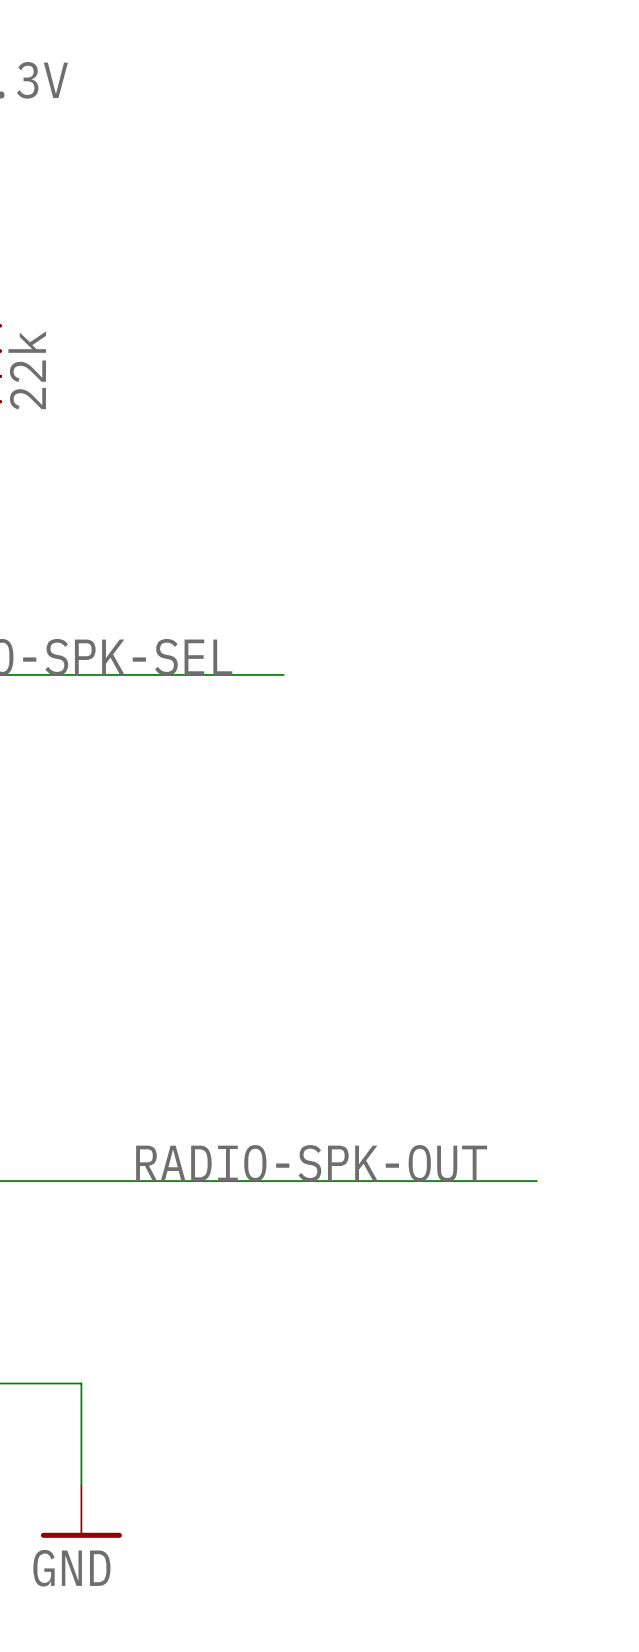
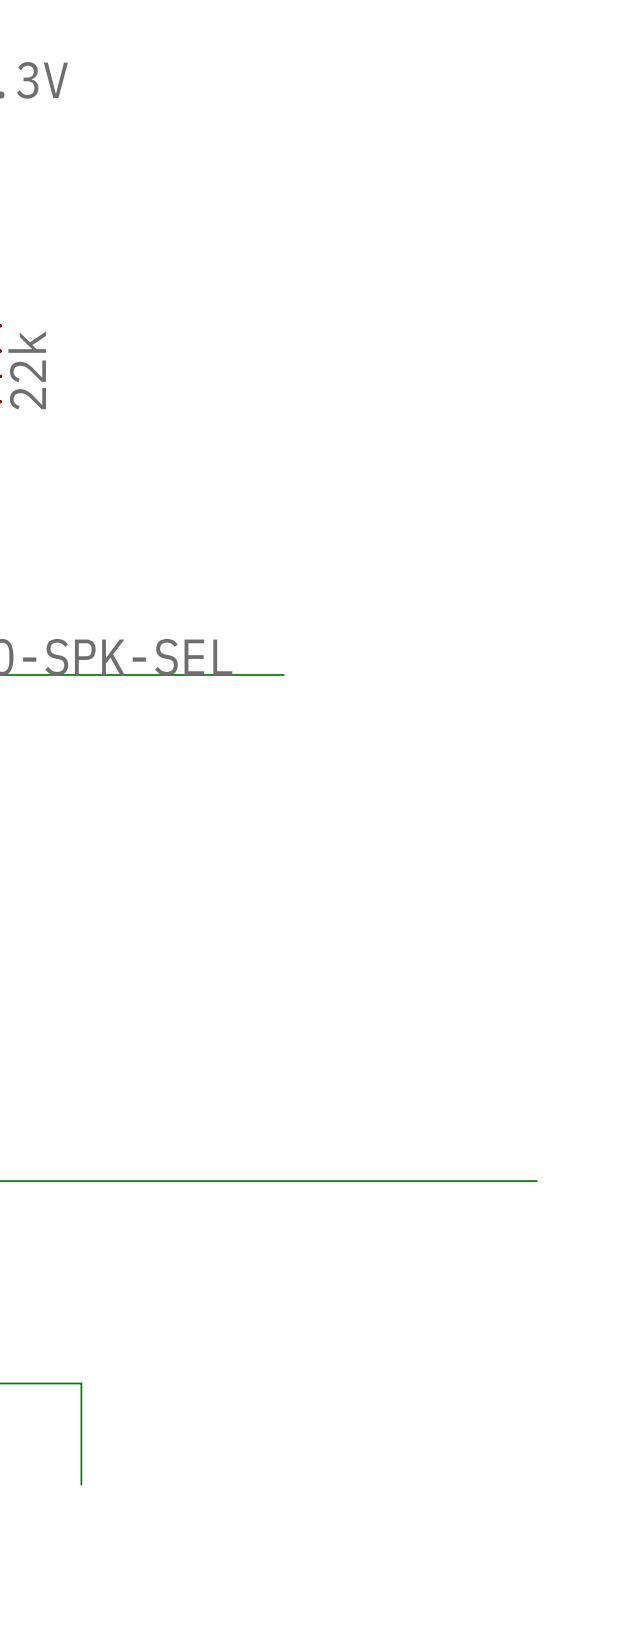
label: RADIO-SPK-OUT (311, 1163) -> none
power symbol: GND (81, 1511) -> none

